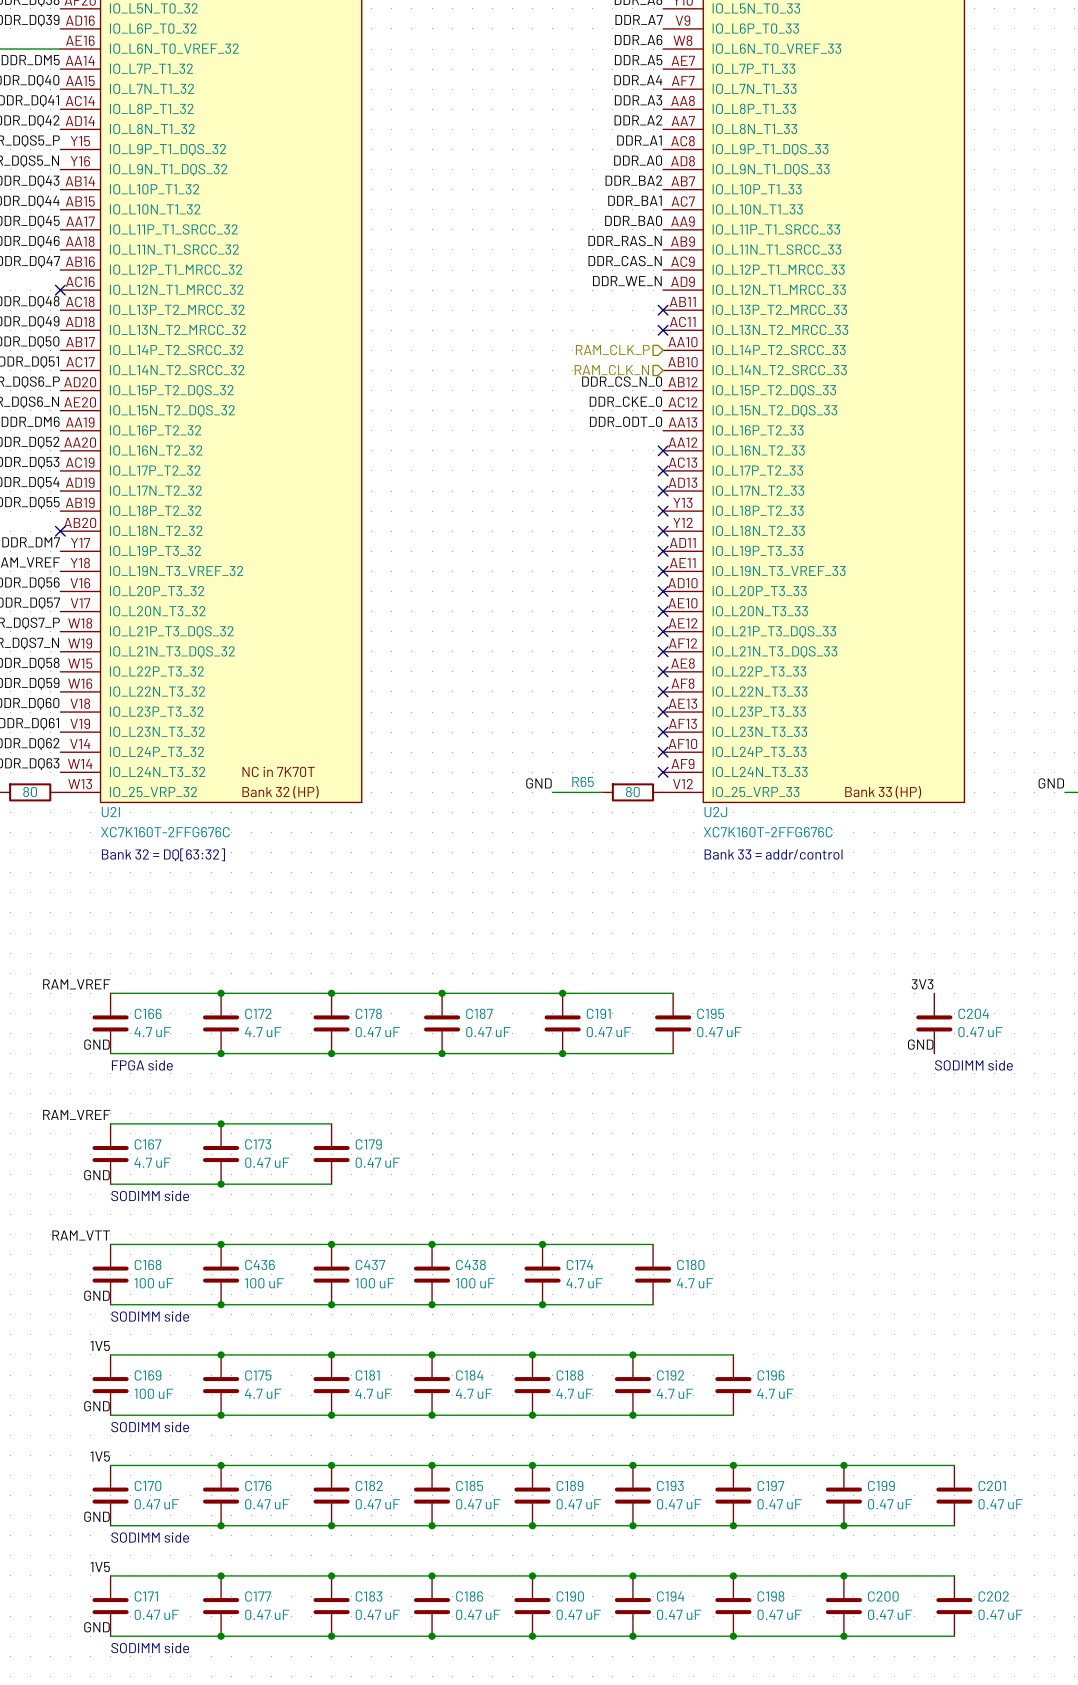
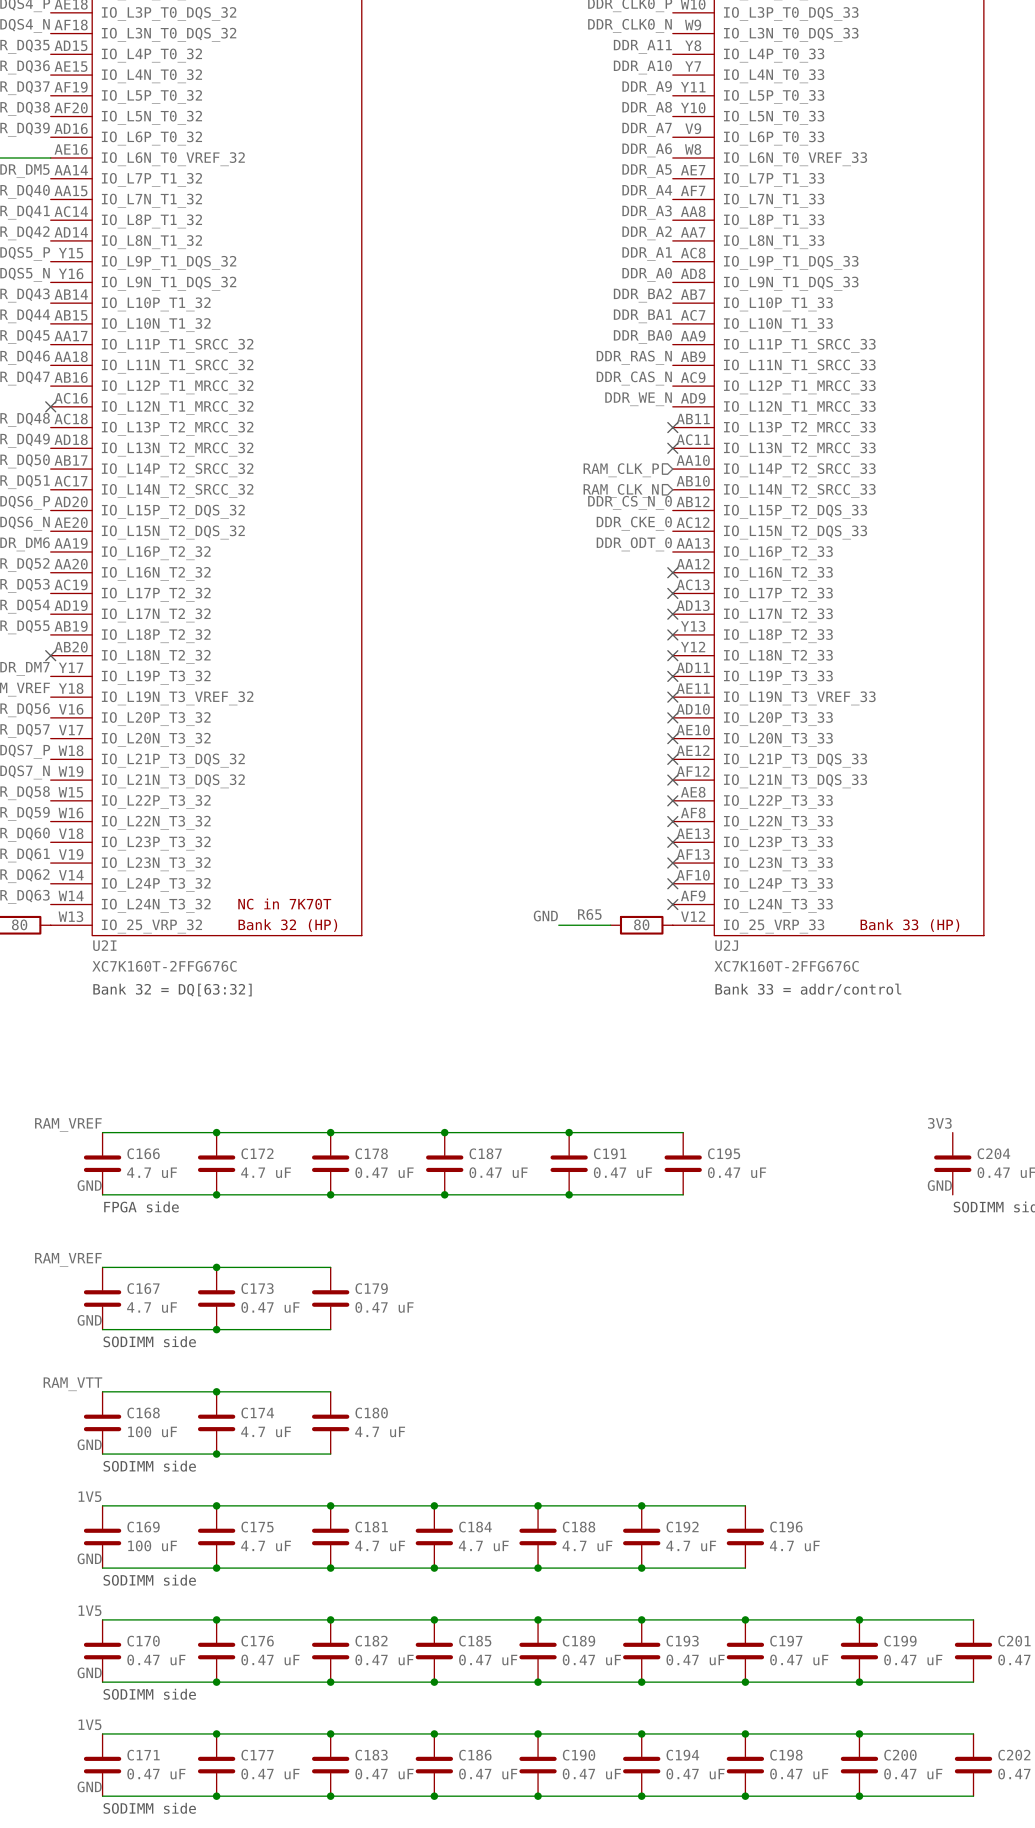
wire: (331, 1244) (653, 1244) -> none
junction: (331, 1244) -> none
junction: (432, 1244) -> none
junction: (542, 1244) -> none
C436 name: C436 (260, 1264) -> C174 (257, 1413)
C437 name: C437 (370, 1264) -> C180 (371, 1413)
C438: 100 uF (432, 1274) -> none
C174: 4.7 uF (542, 1274) -> none
C180: 4.7 uF (653, 1274) -> none
C436 value: 100 uF (264, 1283) -> 4.7 uF (266, 1431)
C437 value: 100 uF (374, 1283) -> 4.7 uF (380, 1431)
wire: (331, 1304) (653, 1304) -> none
junction: (331, 1304) -> none
junction: (432, 1304) -> none
junction: (542, 1304) -> none

